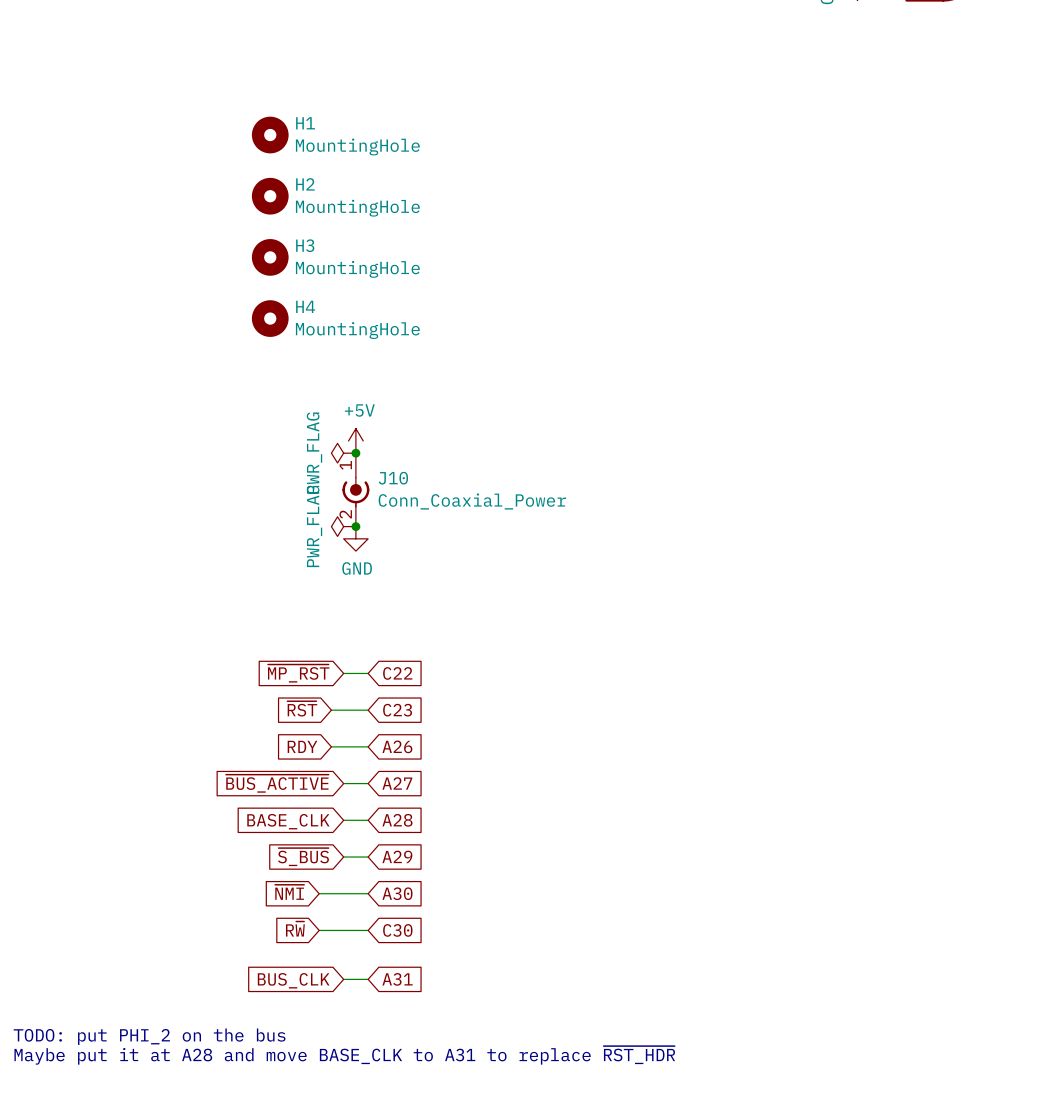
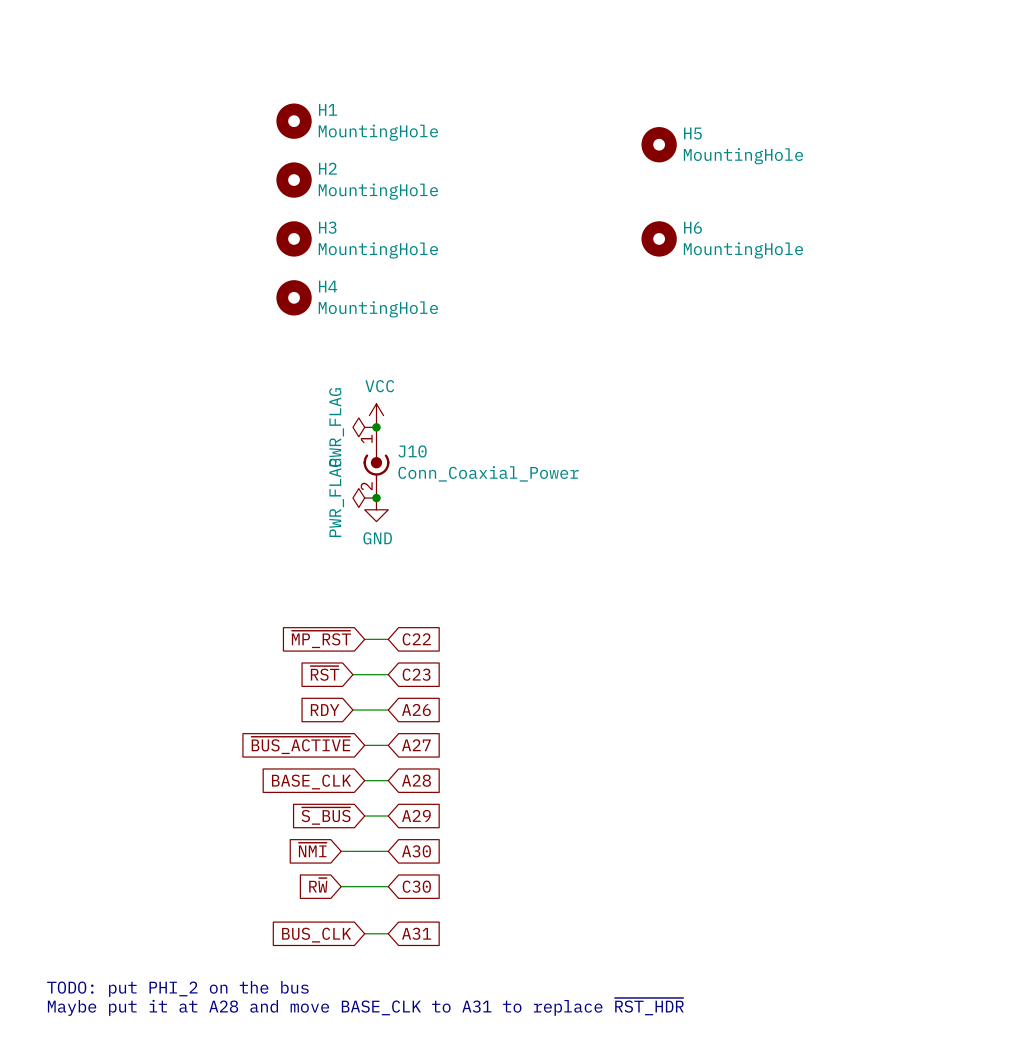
H5: none -> MountingHole (659, 144)
H6: none -> MountingHole (659, 238)
power symbol: +5V (355, 440) -> VCC (376, 415)

